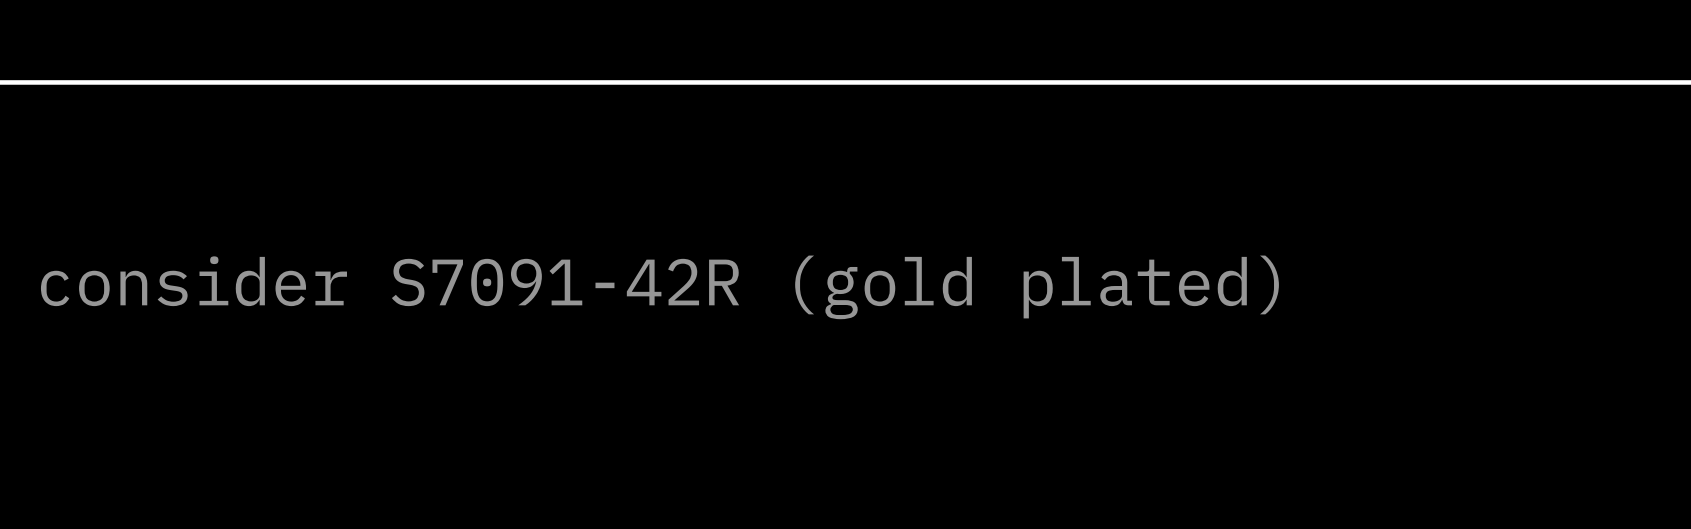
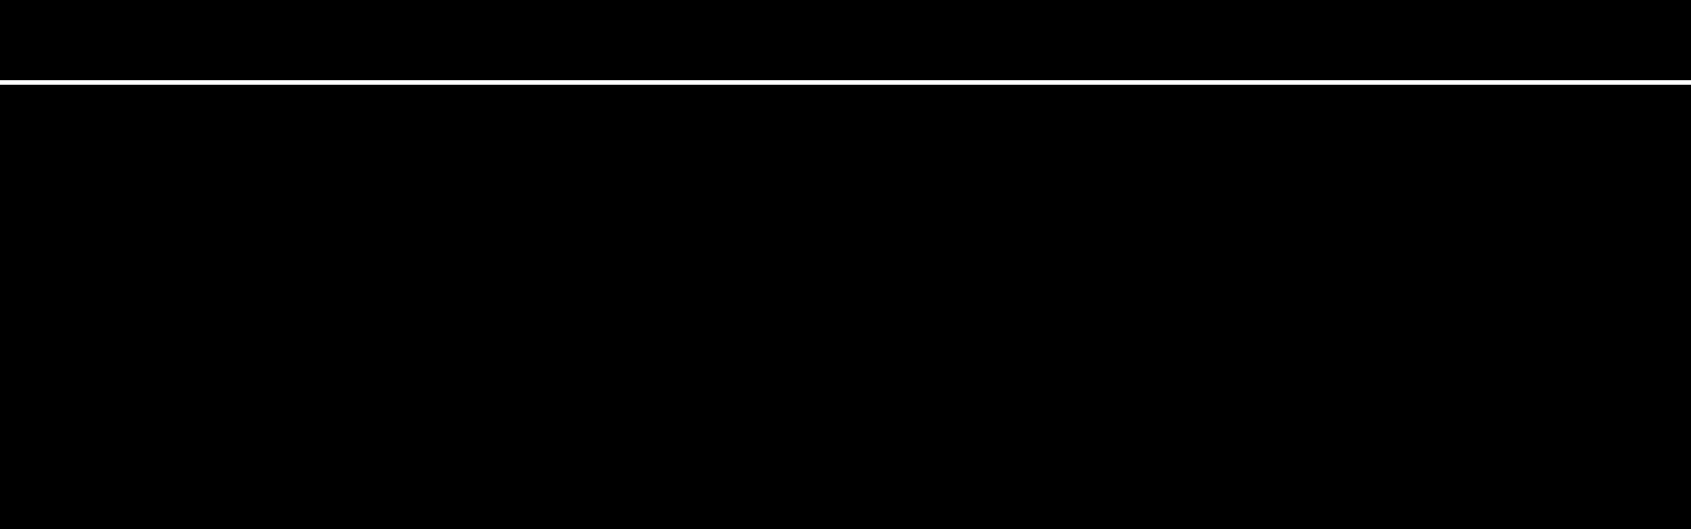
text: consider S7091-42R (gold plated) (659, 287) -> none

